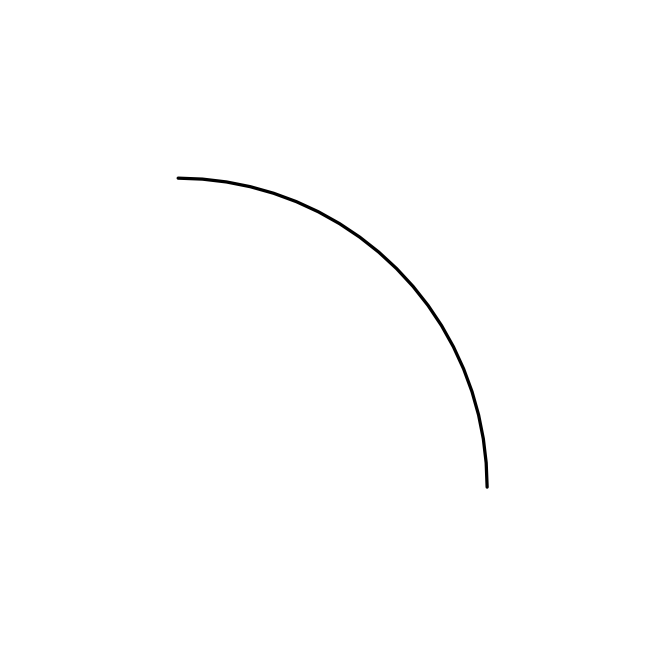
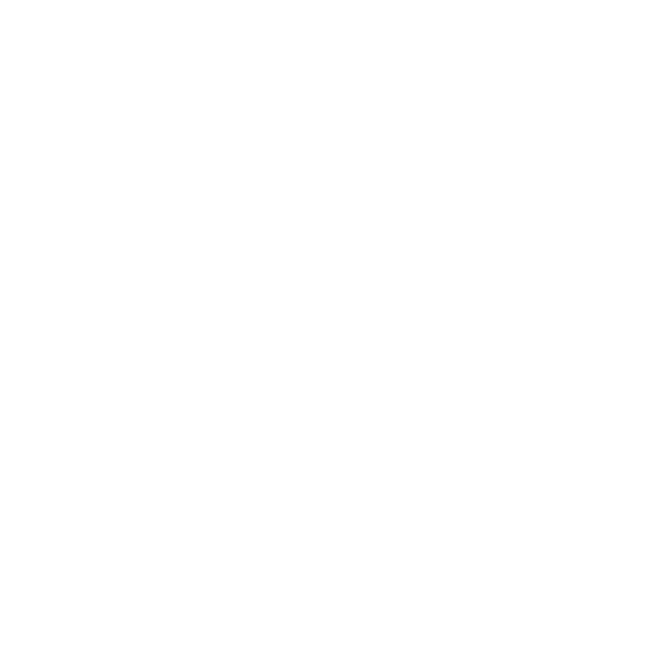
board edge: (178, 178) (226, 181) (250, 186) (296, 201) (318, 211) (359, 237) (396, 268) (413, 286) (441, 325) (463, 368) (478, 415) (483, 438) (487, 487) -> none

